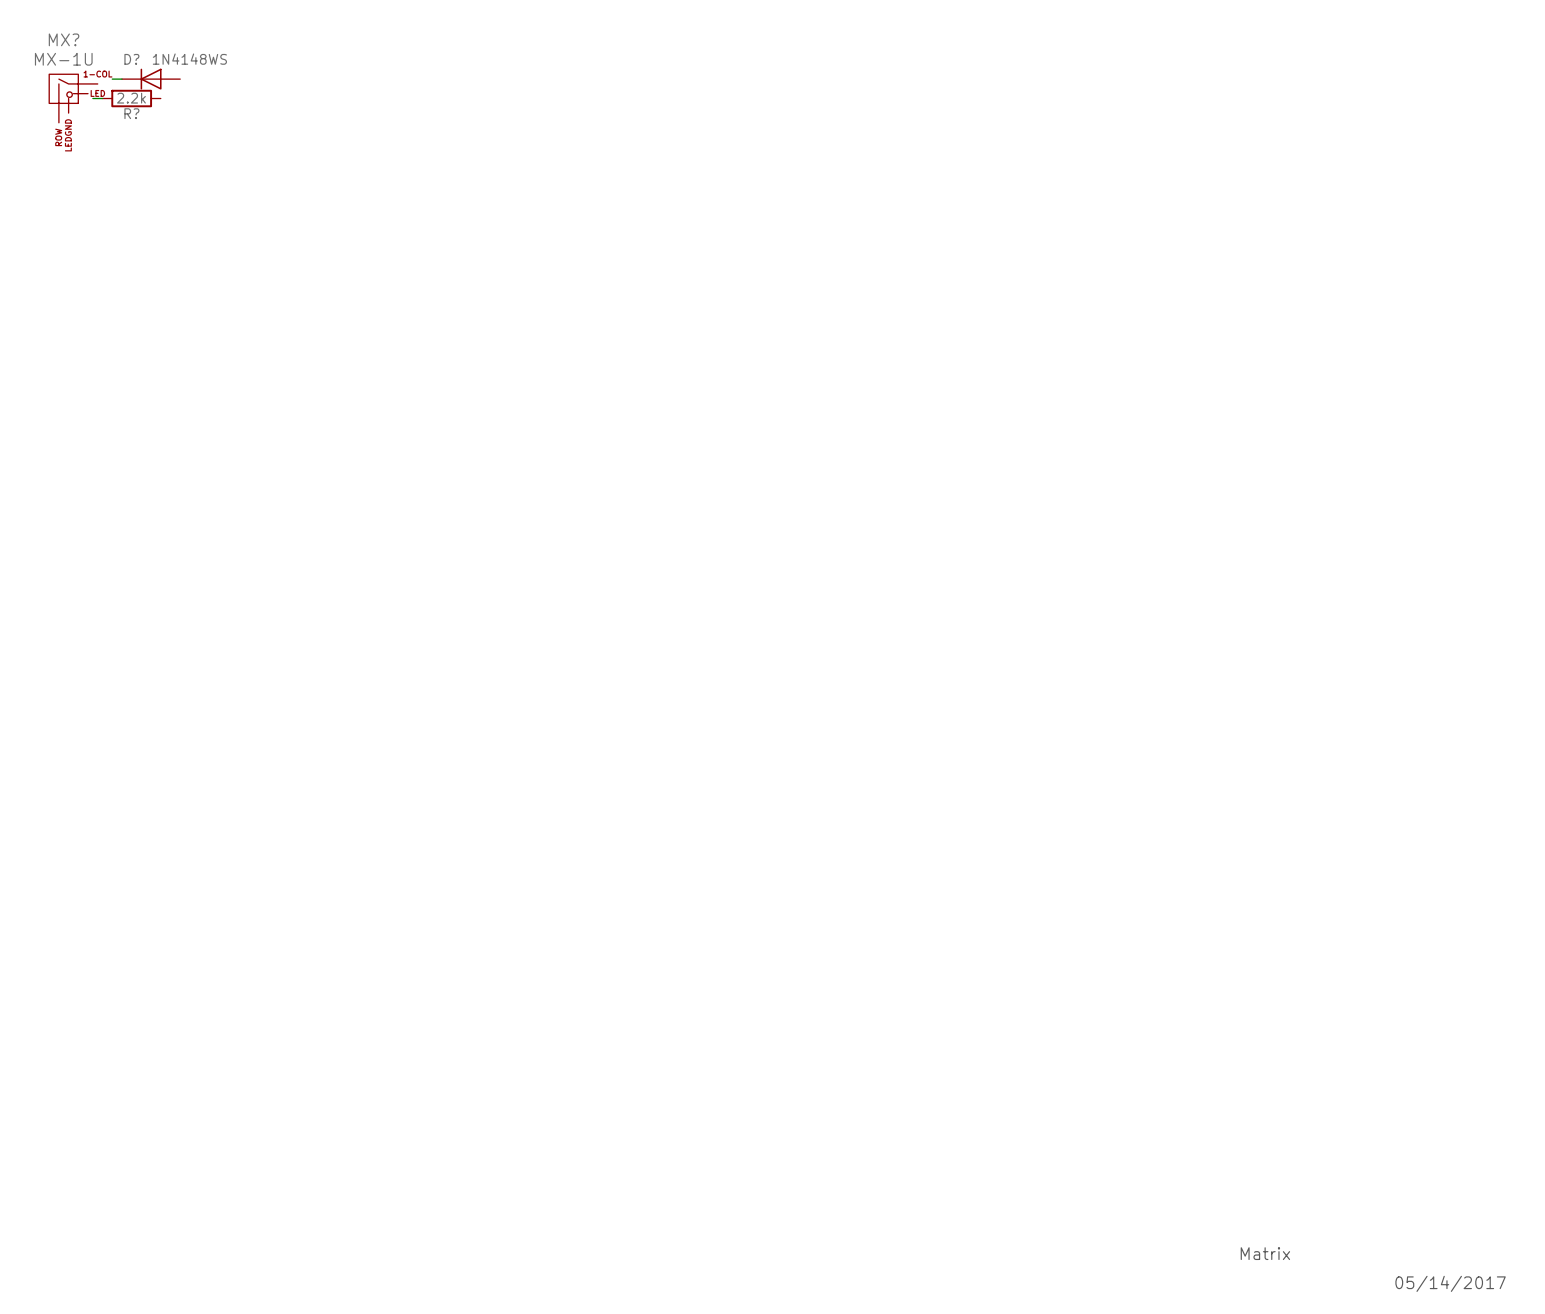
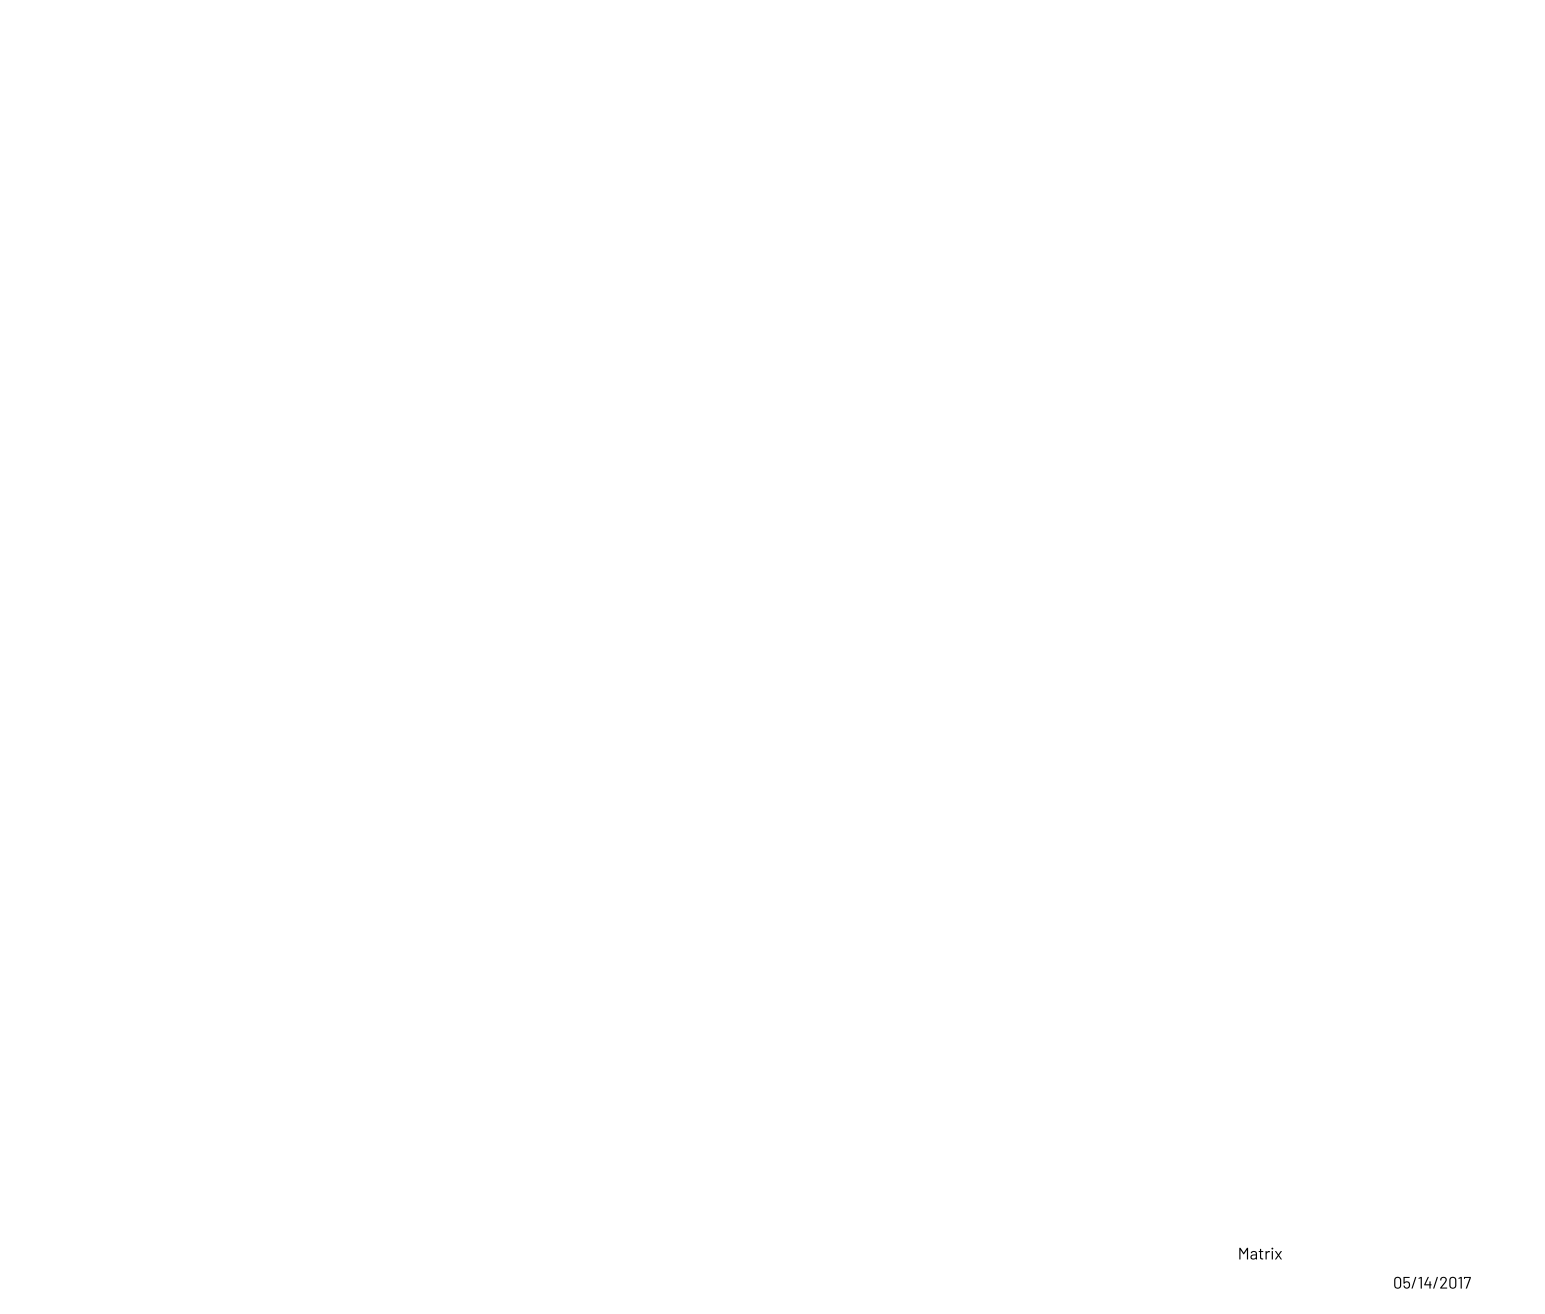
wire: (112, 79) (121, 79) -> none
D?: 1N4148WS (151, 79) -> none
MX?: MX-1U (73, 98) -> none
wire: (92, 98) (102, 98) -> none
R?: 2.2k (131, 98) -> none

